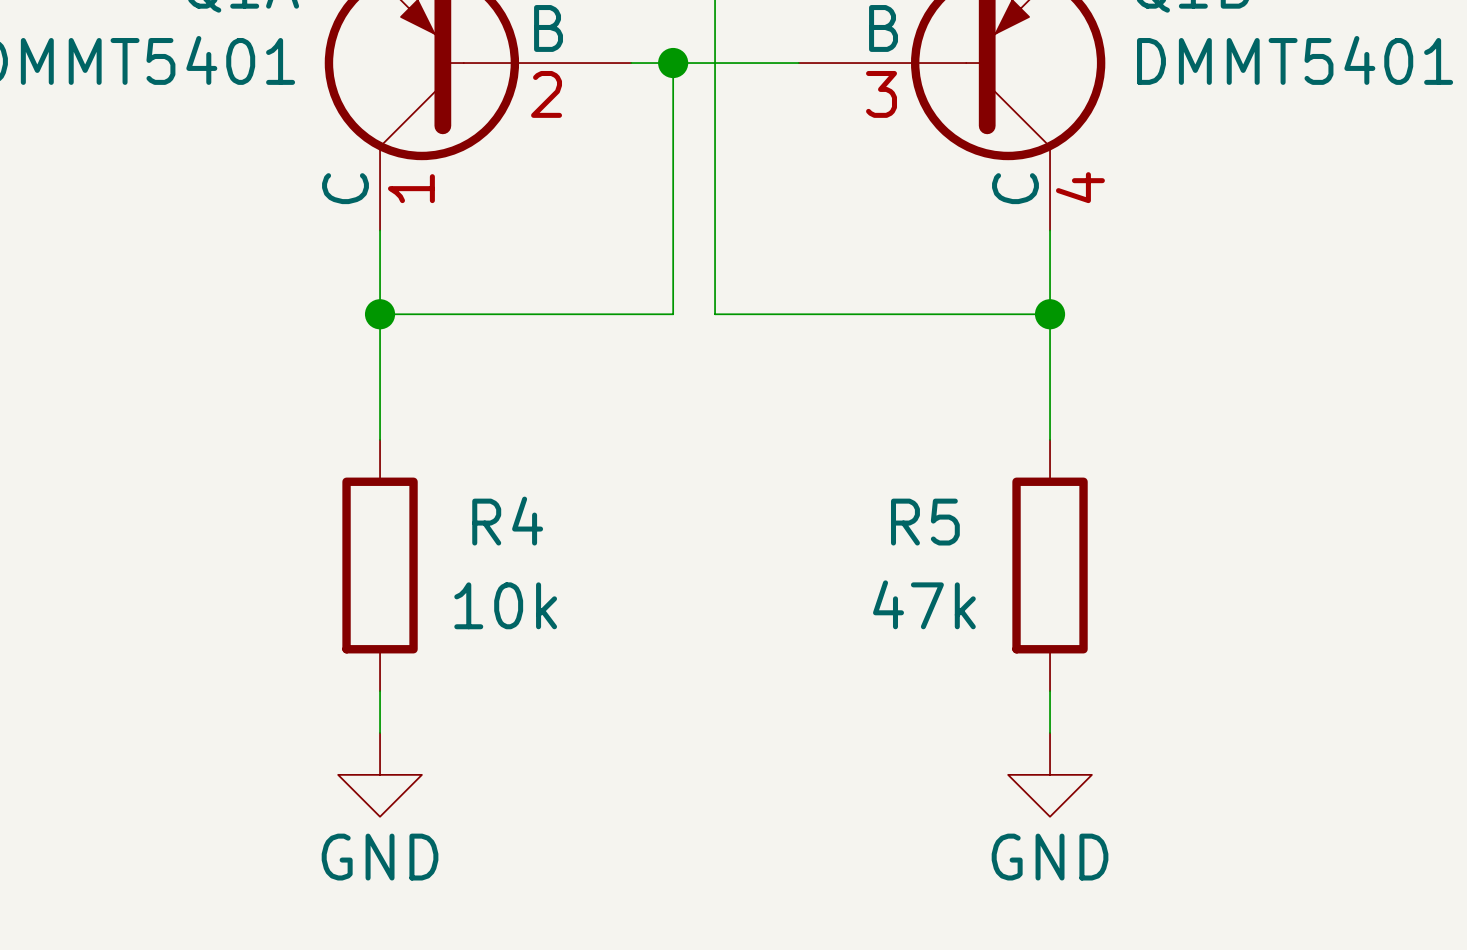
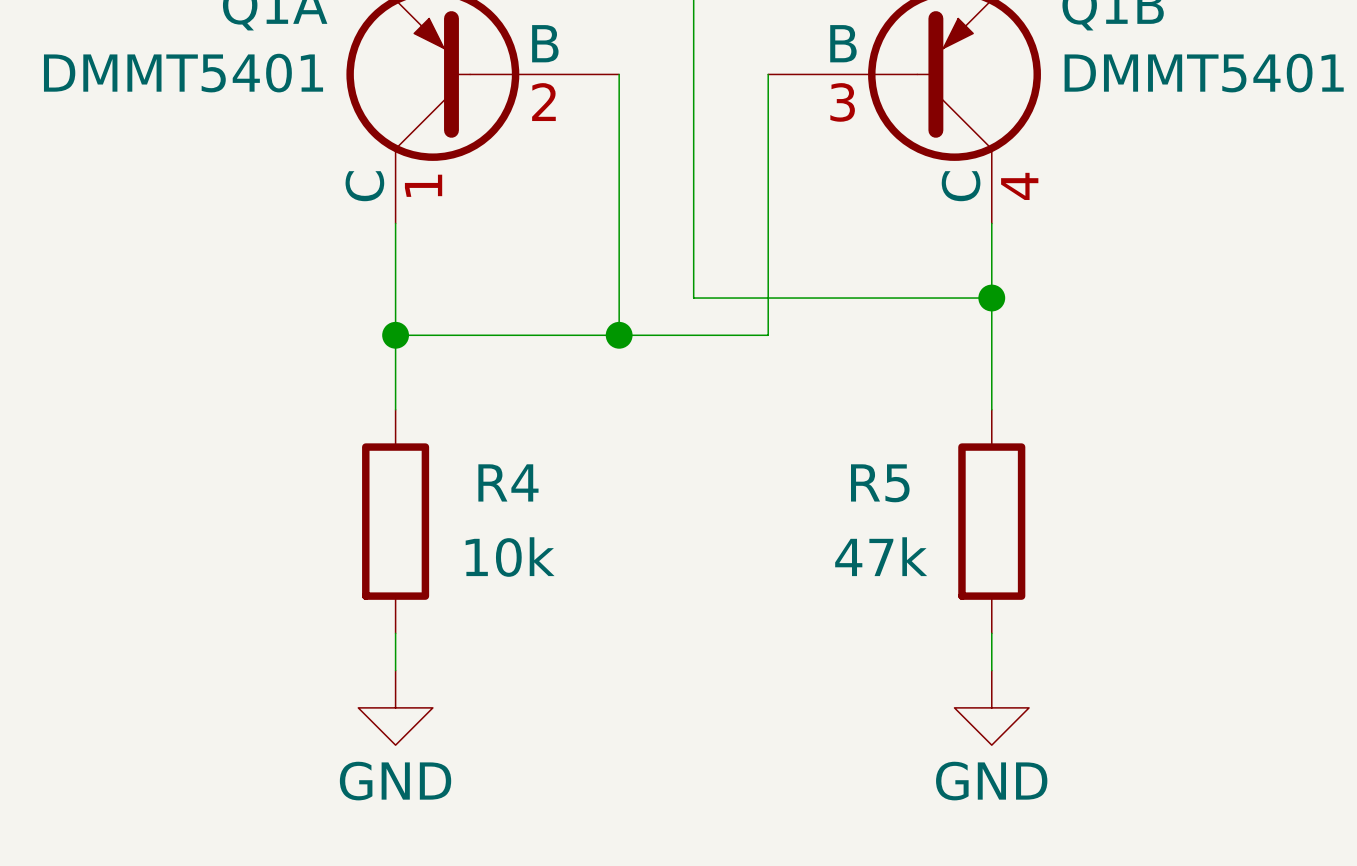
wire: (631, 63) (798, 63) -> (619, 74) (619, 335)
wire: (673, 63) (673, 314) (380, 314) -> none
junction: (673, 63) -> none
wire: none -> (768, 74) (768, 335) (395, 335)
junction position: (380, 314) -> (395, 335)
junction: none -> (619, 335)

